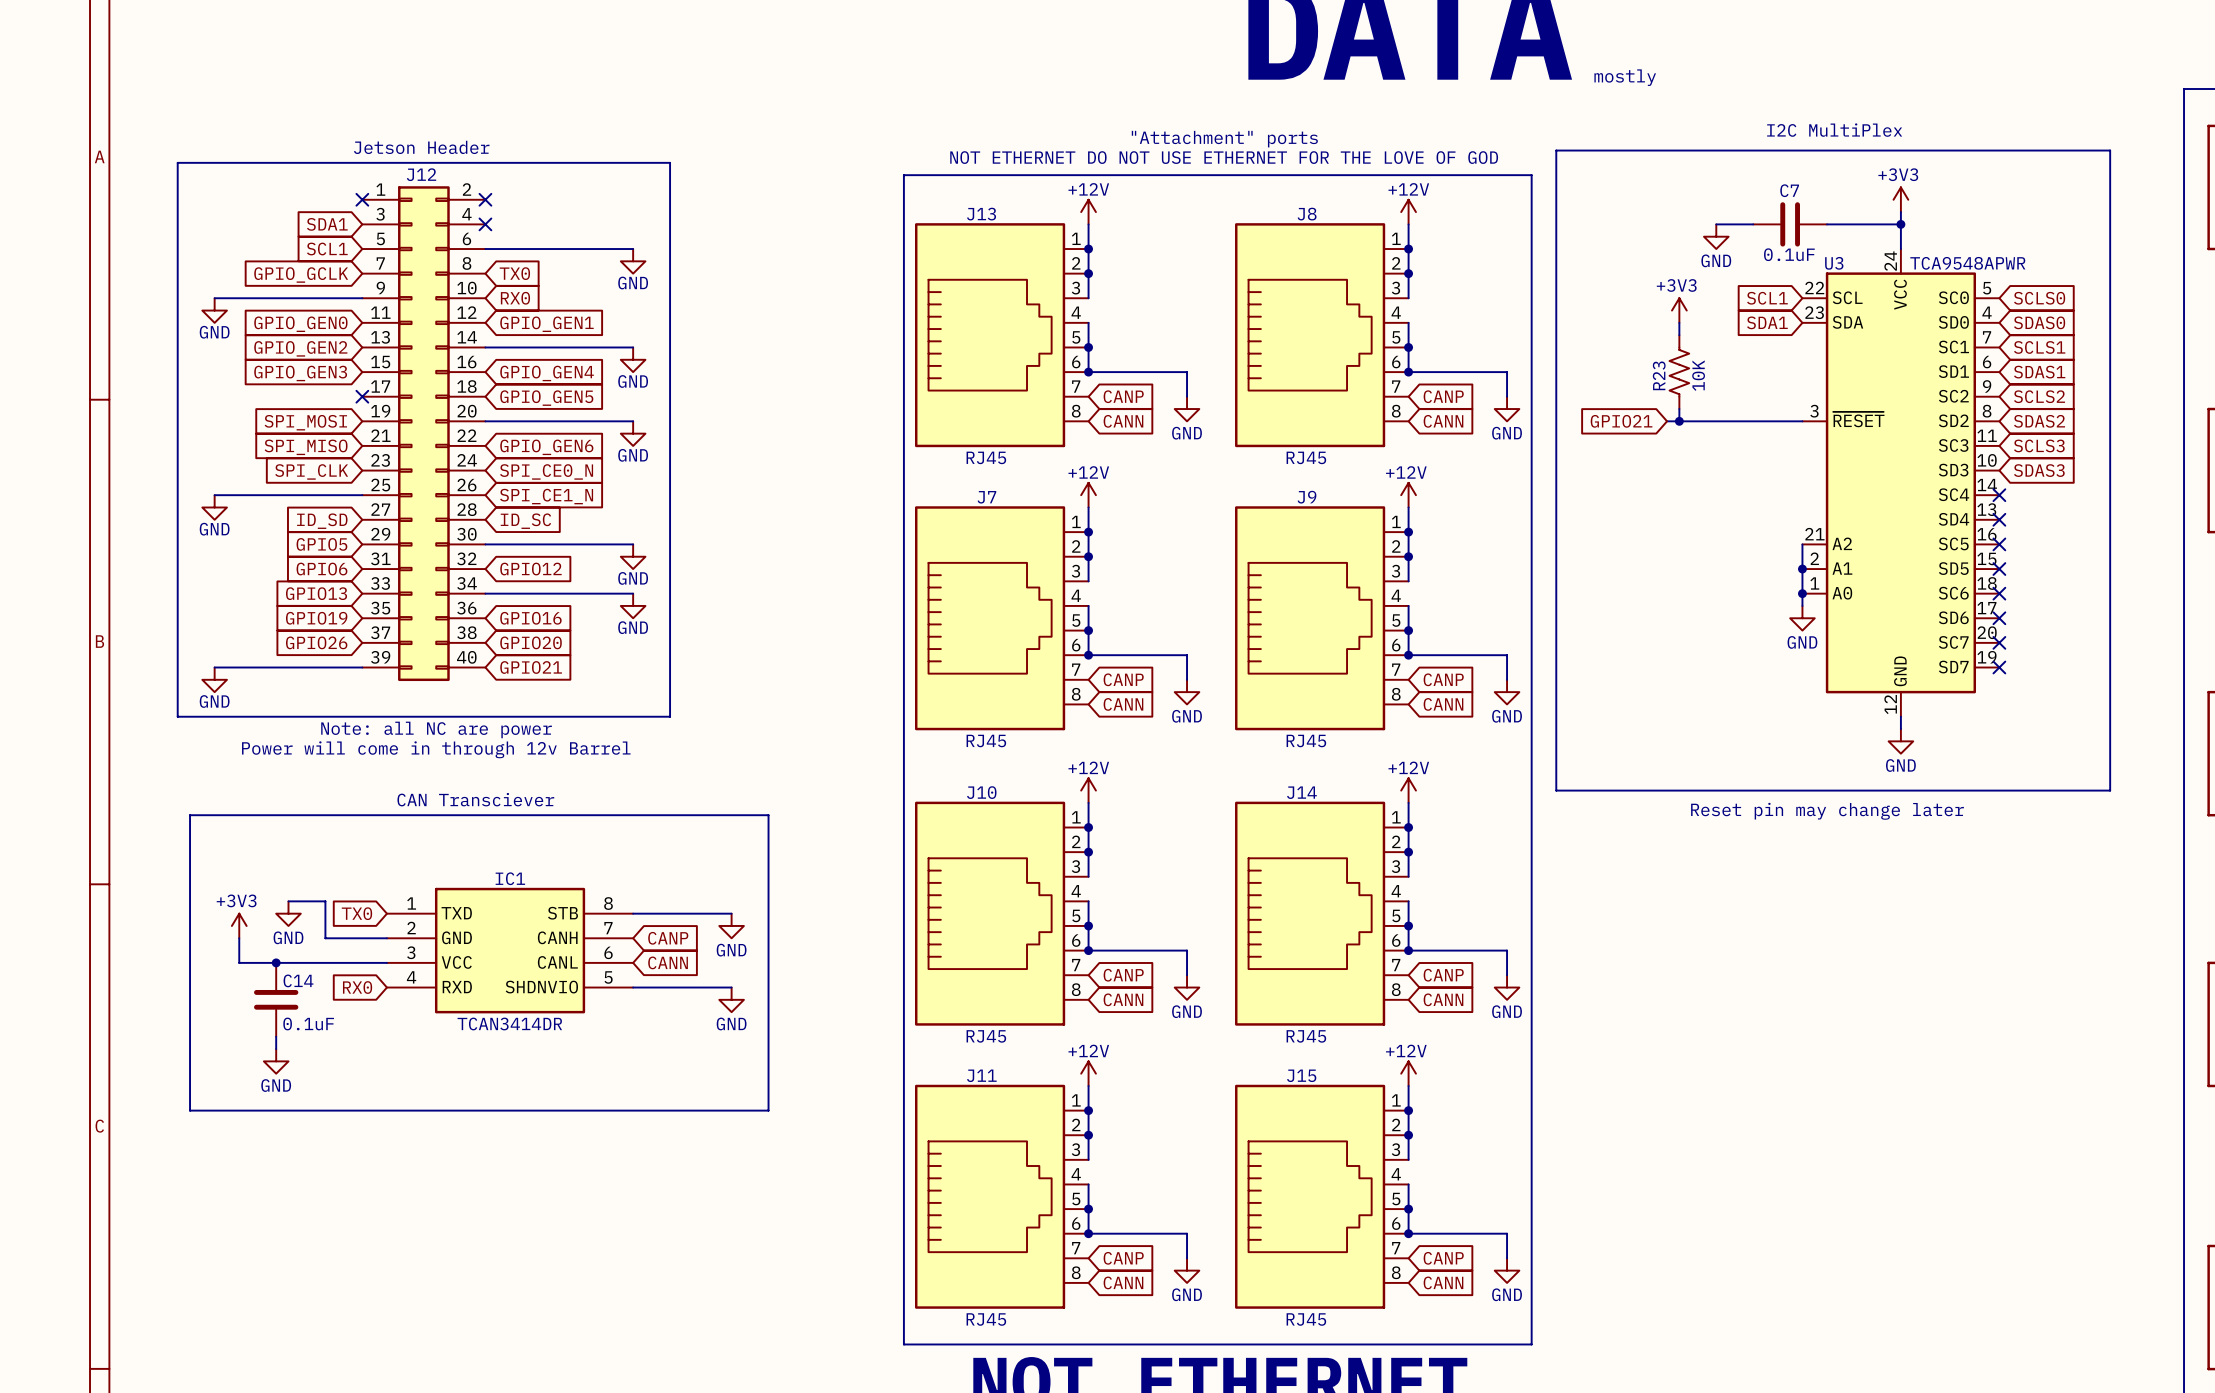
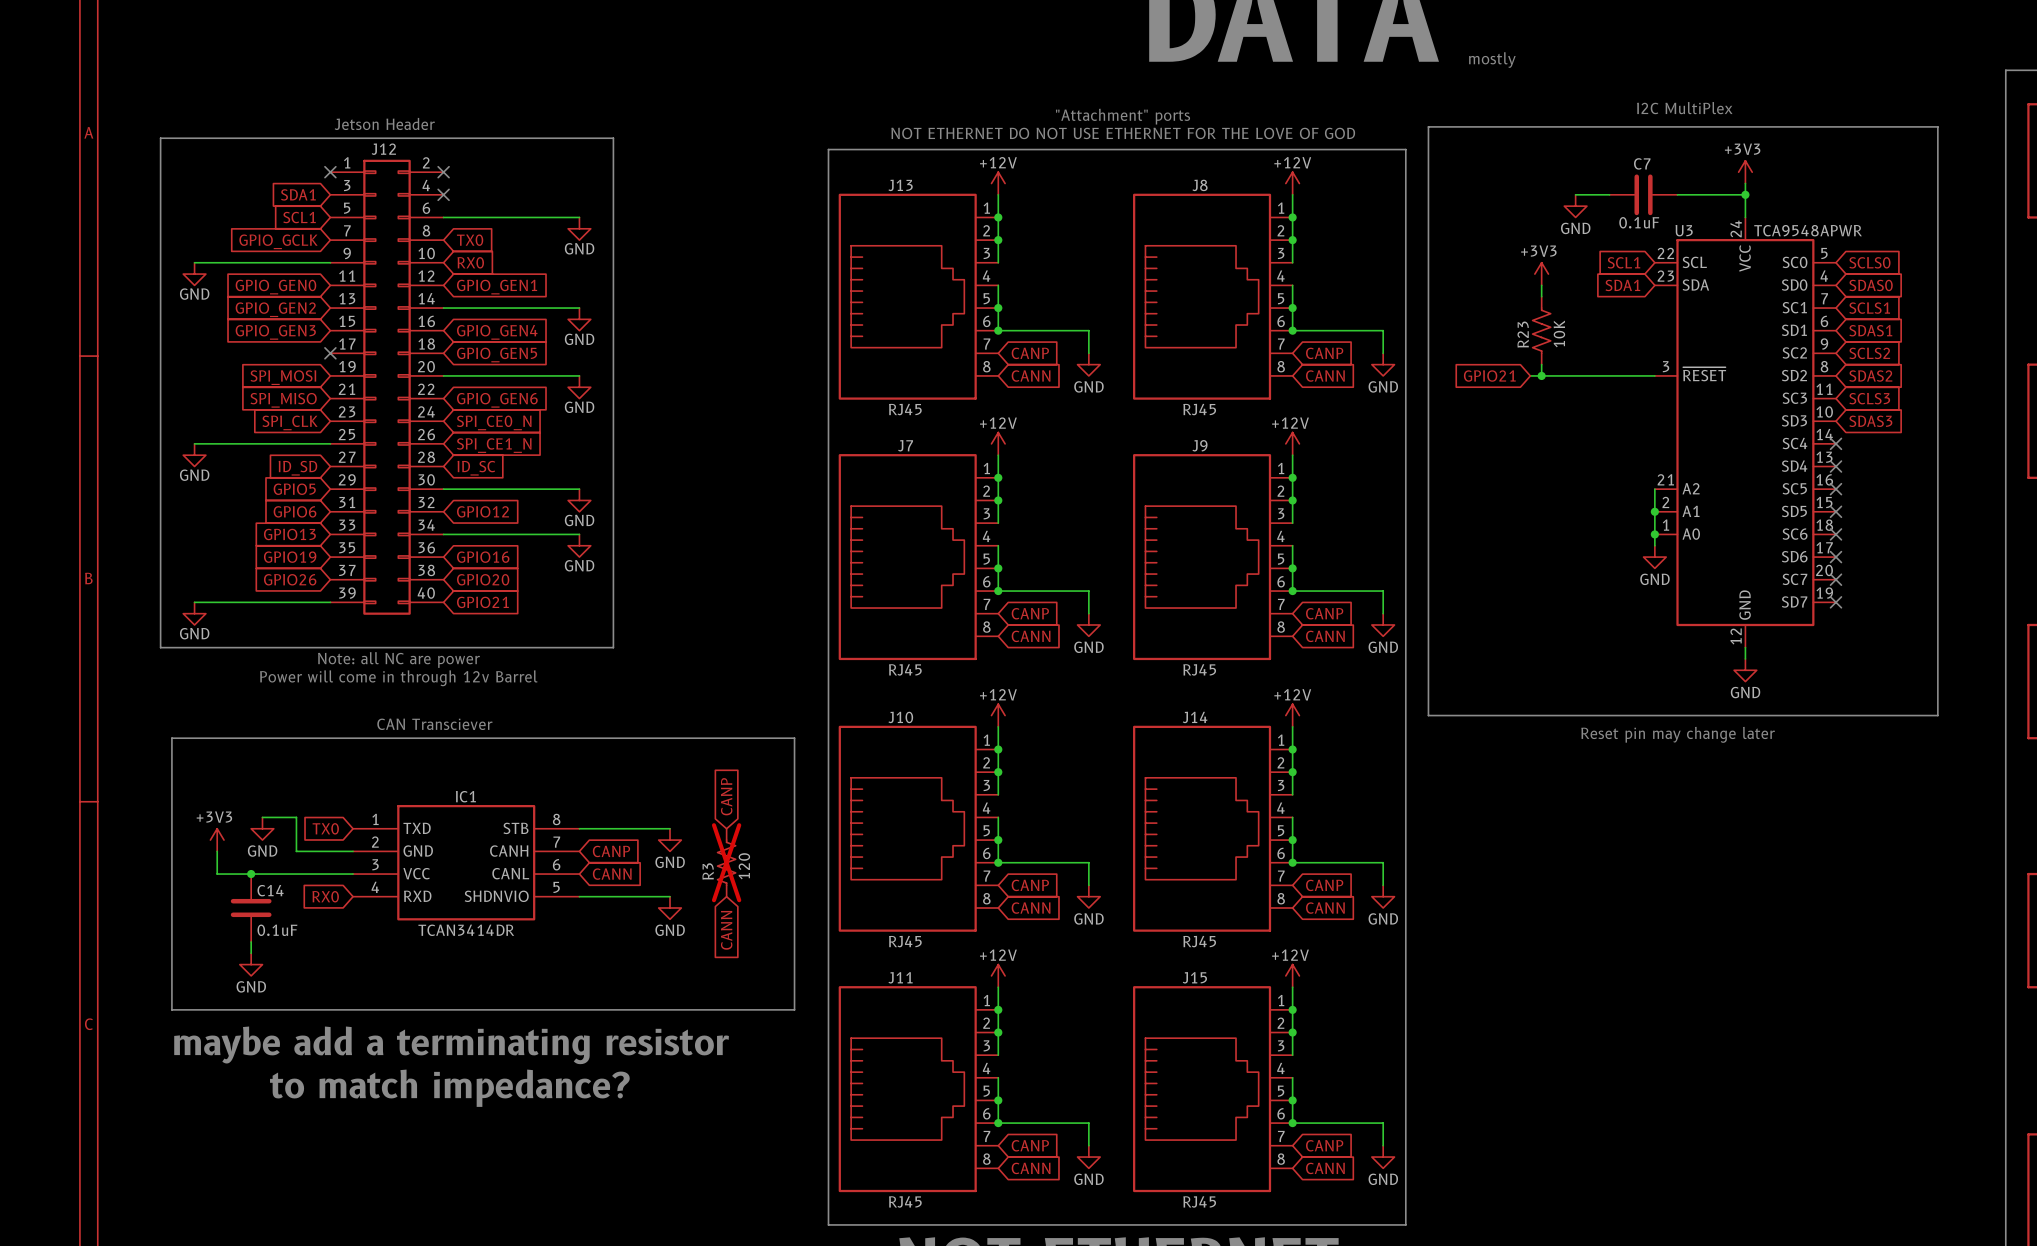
line: (768, 815) (768, 1110) -> (703, 738) (794, 738) (794, 1009) (703, 1009)
global label: none -> CANP (726, 796)
R3: none -> 120 (726, 862)
global label: none -> CANN (726, 930)
text: none -> maybe add a terminating resistor (451, 1045)
text: none -> to match impedance? (449, 1088)

